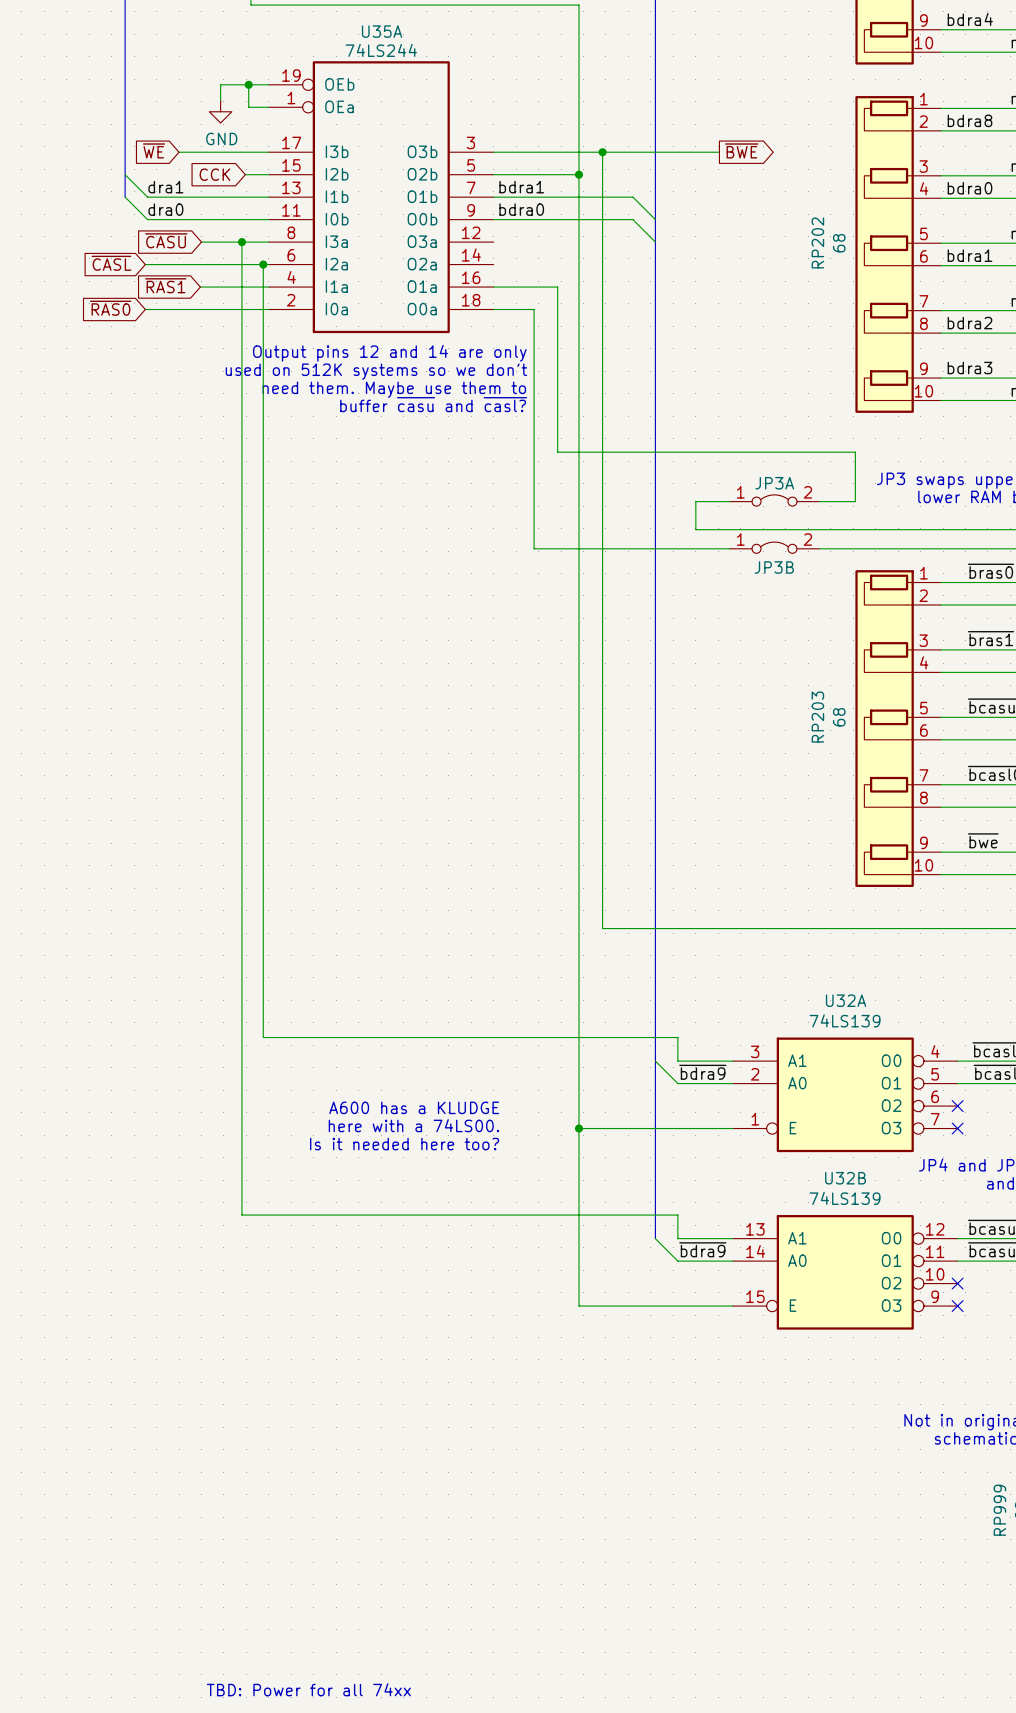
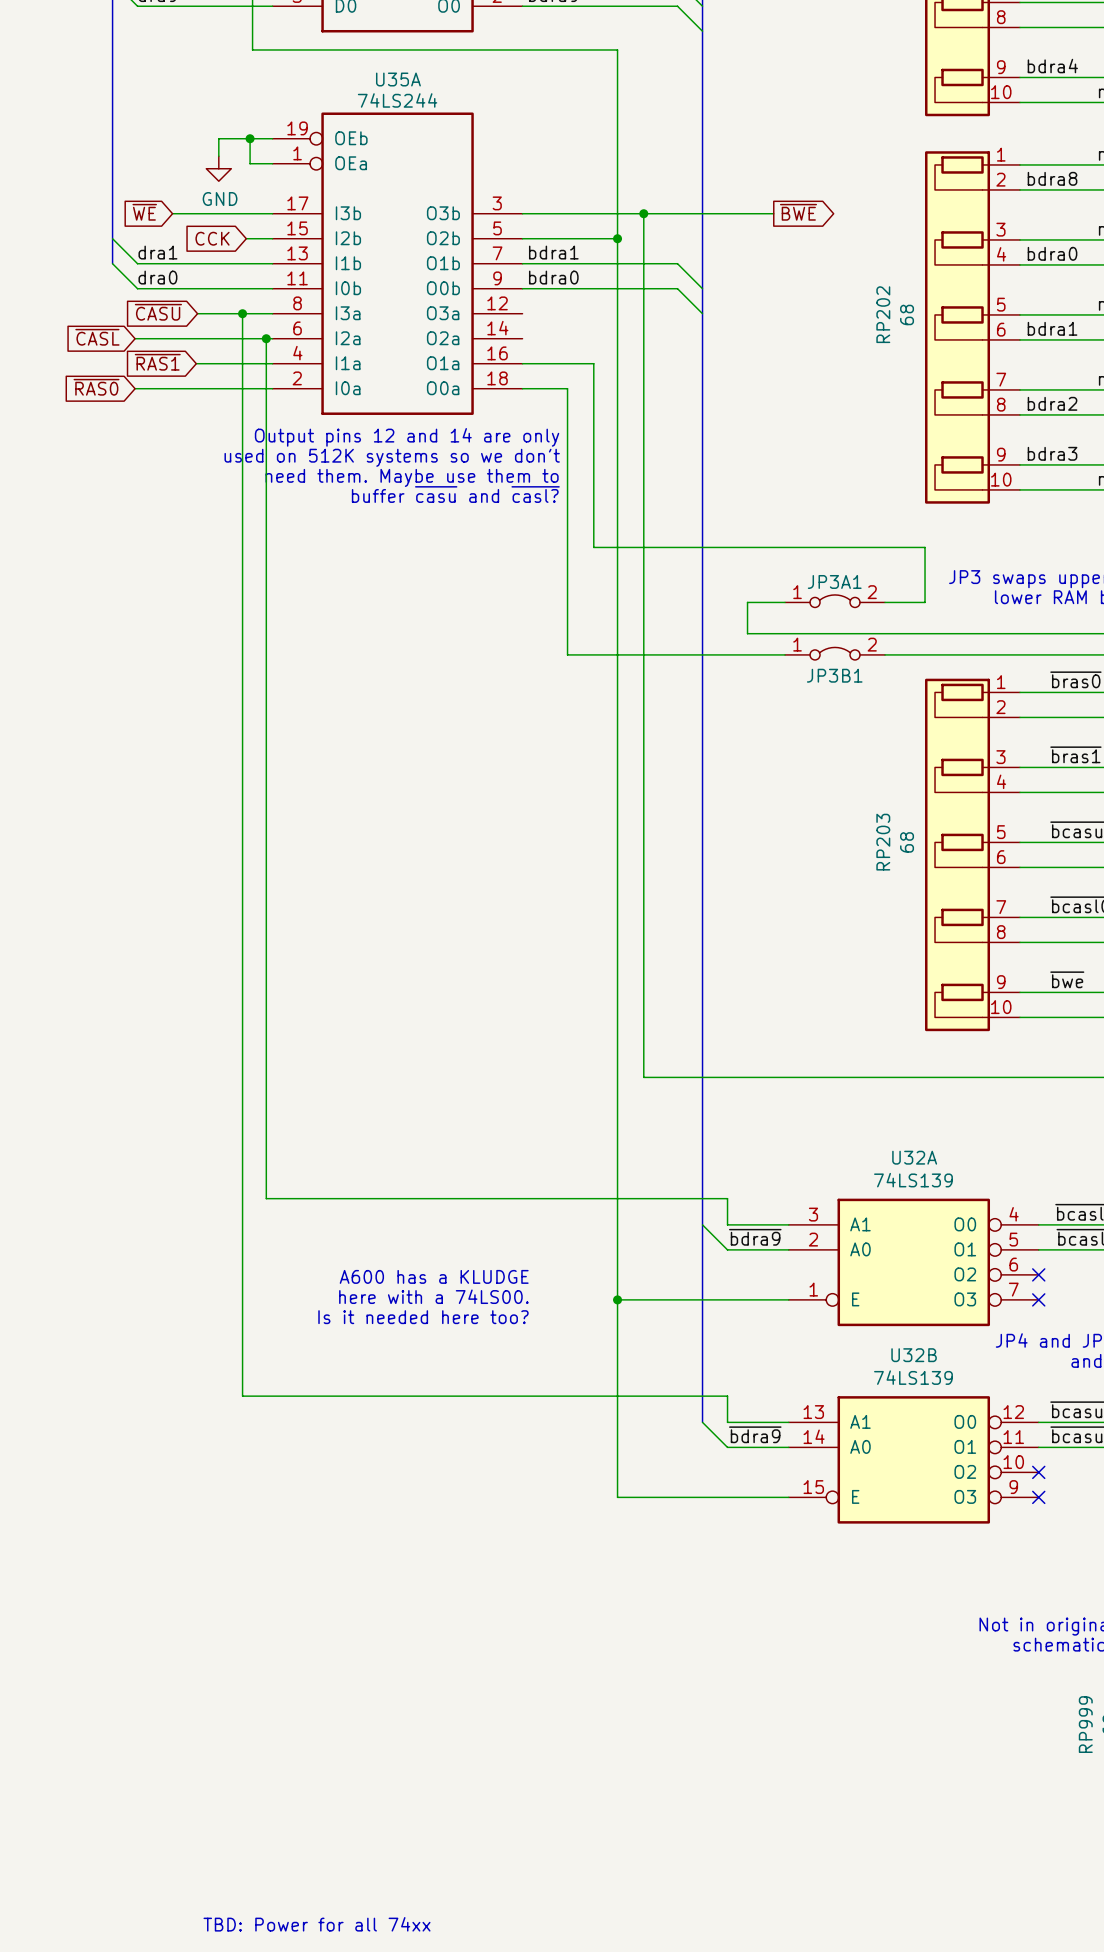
JP3A name: JP3A (774, 483) -> JP3A1 (834, 581)
JP3B name: JP3B (774, 567) -> JP3B1 (834, 675)

